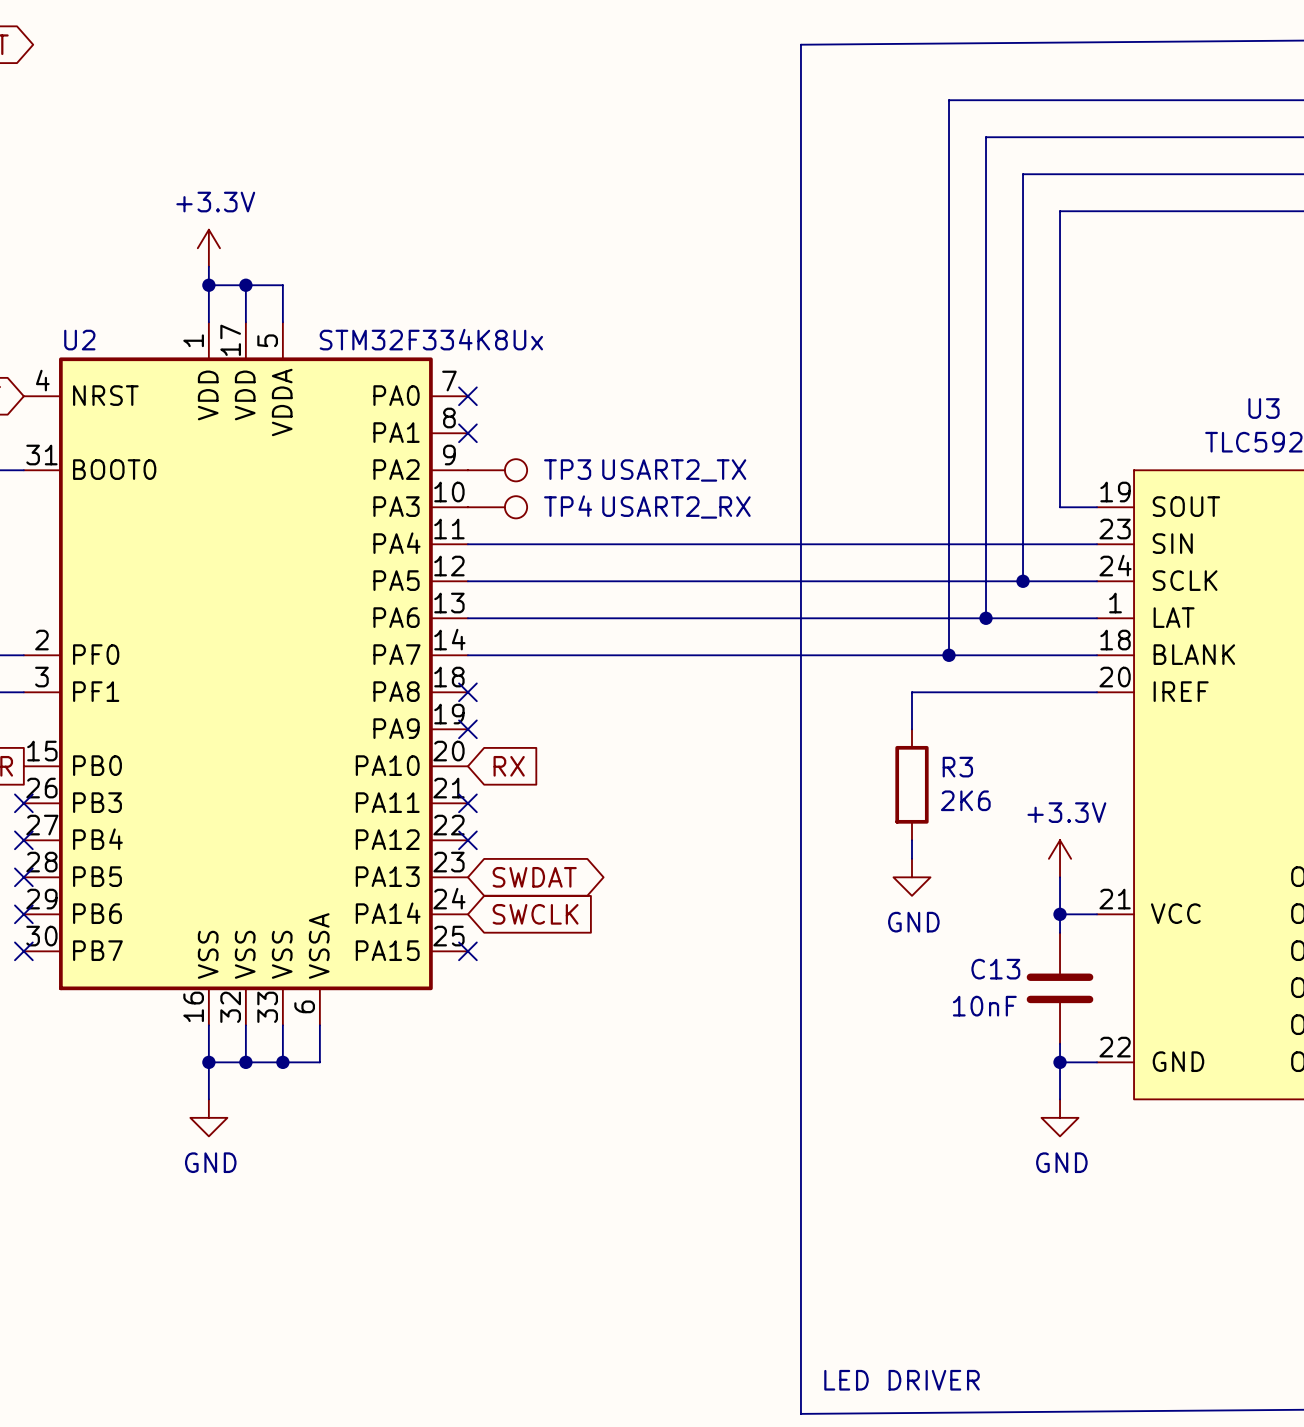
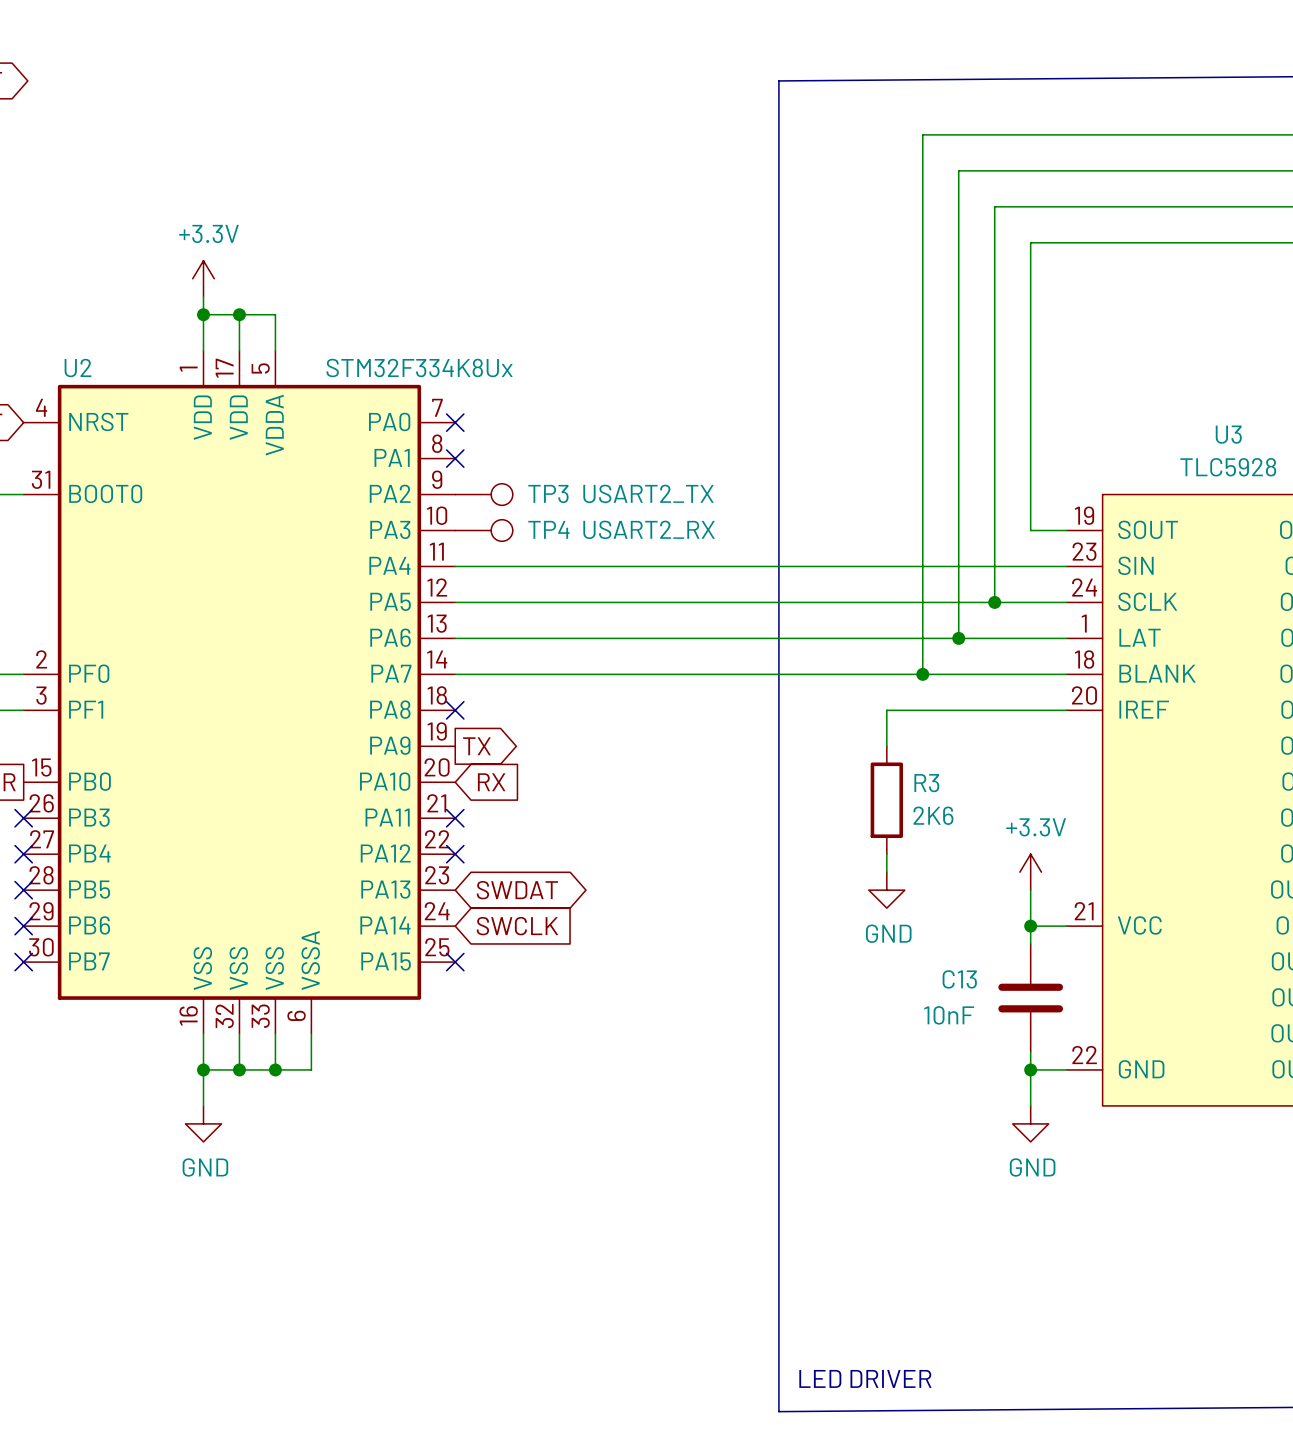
no-connect mark: (467, 729) -> none
global label: none -> TX (476, 746)

